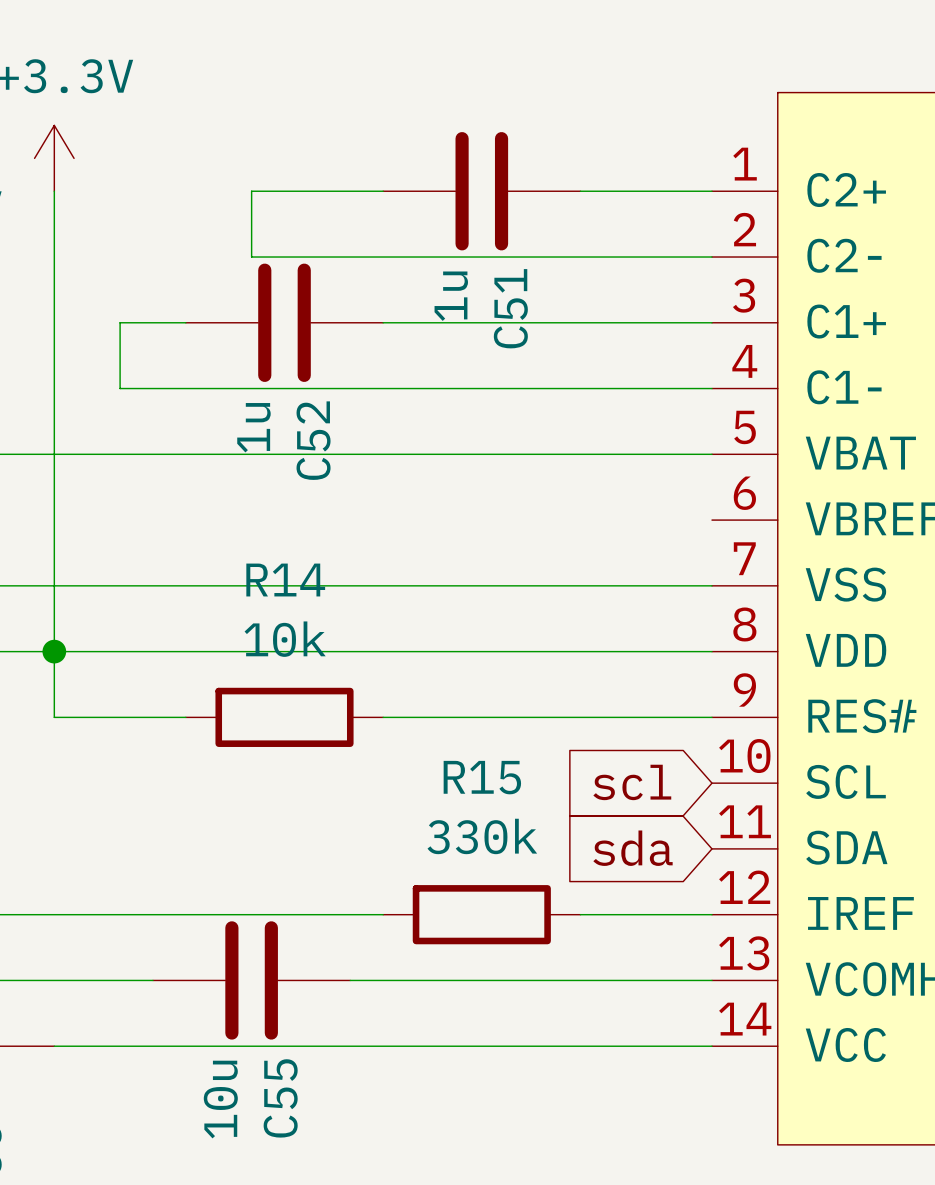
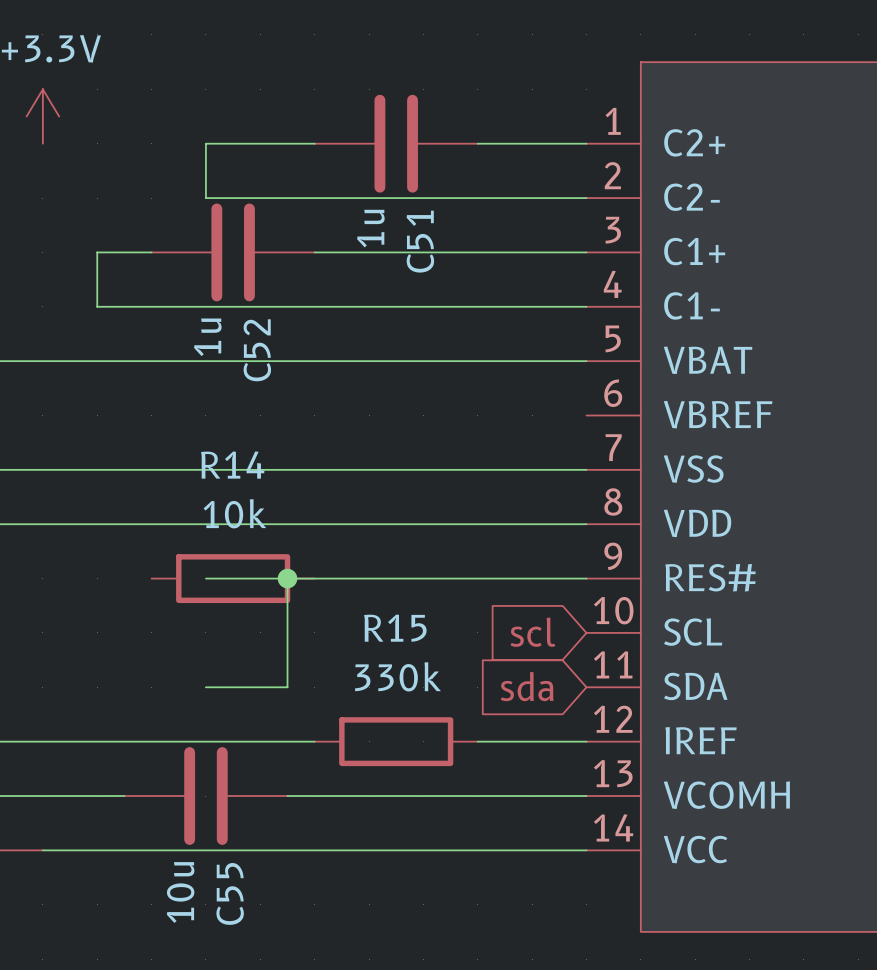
wire: (54, 191) (54, 717) (185, 717) -> none
junction: (54, 651) -> none
wire: none -> (205, 578) (314, 578)
wire: none -> (287, 578) (287, 687) (205, 687)
junction: none -> (287, 578)

